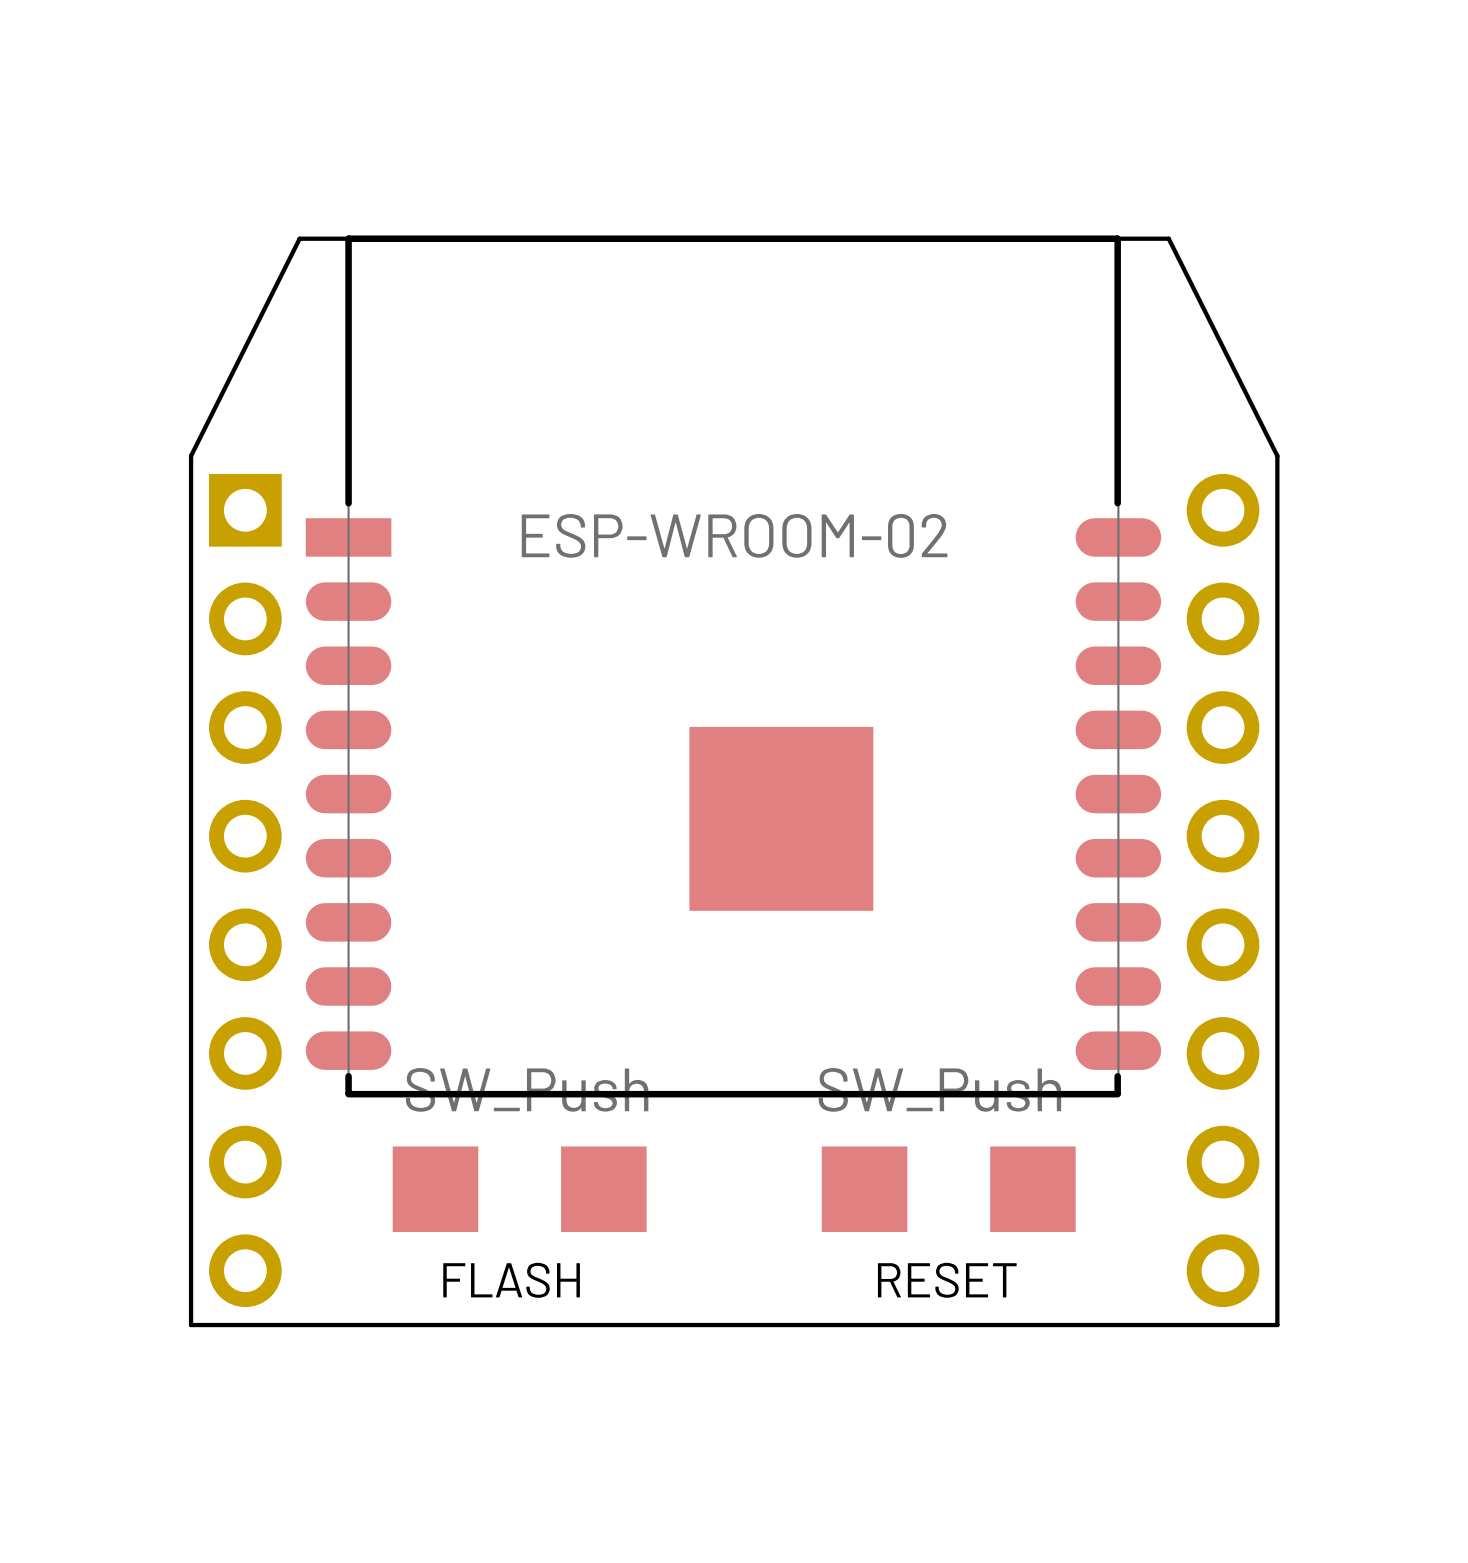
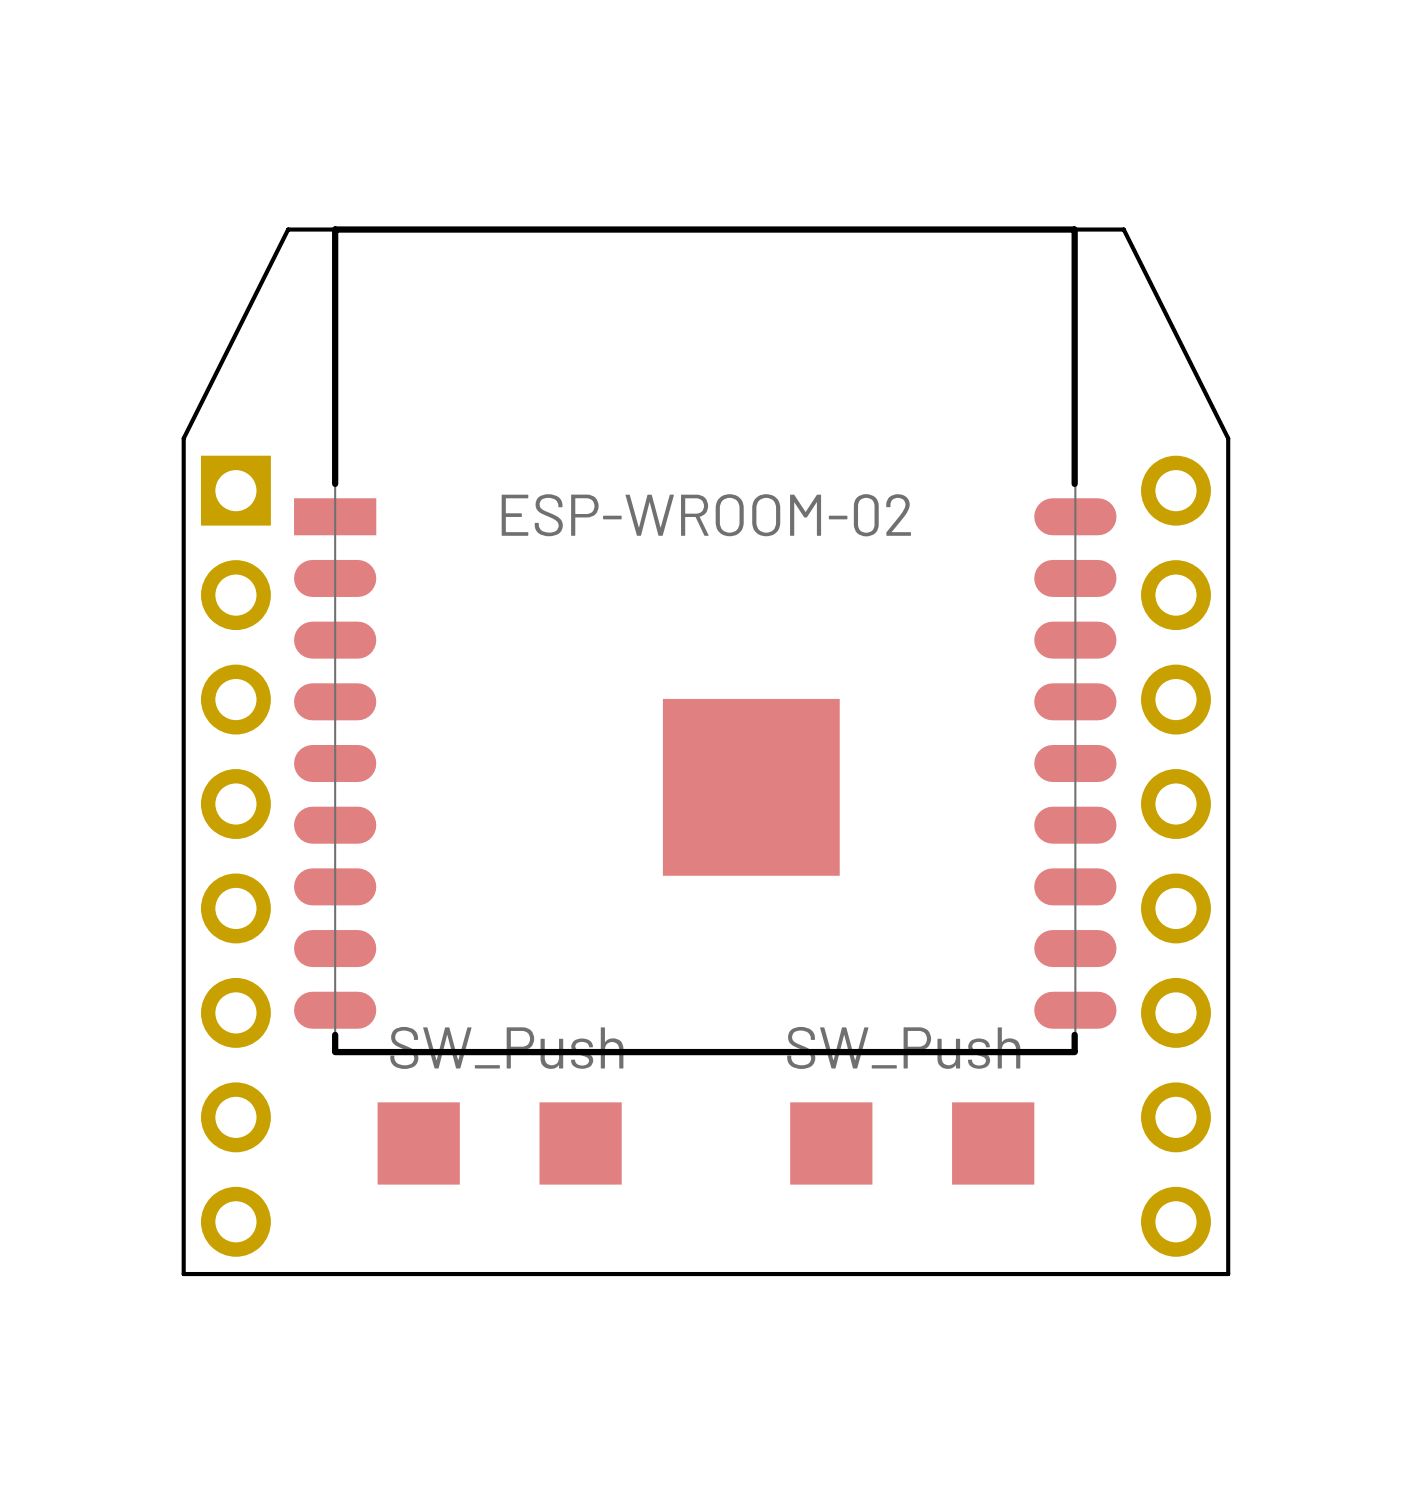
text: FLASH (511, 1280) -> none
text: RESET (947, 1280) -> none

